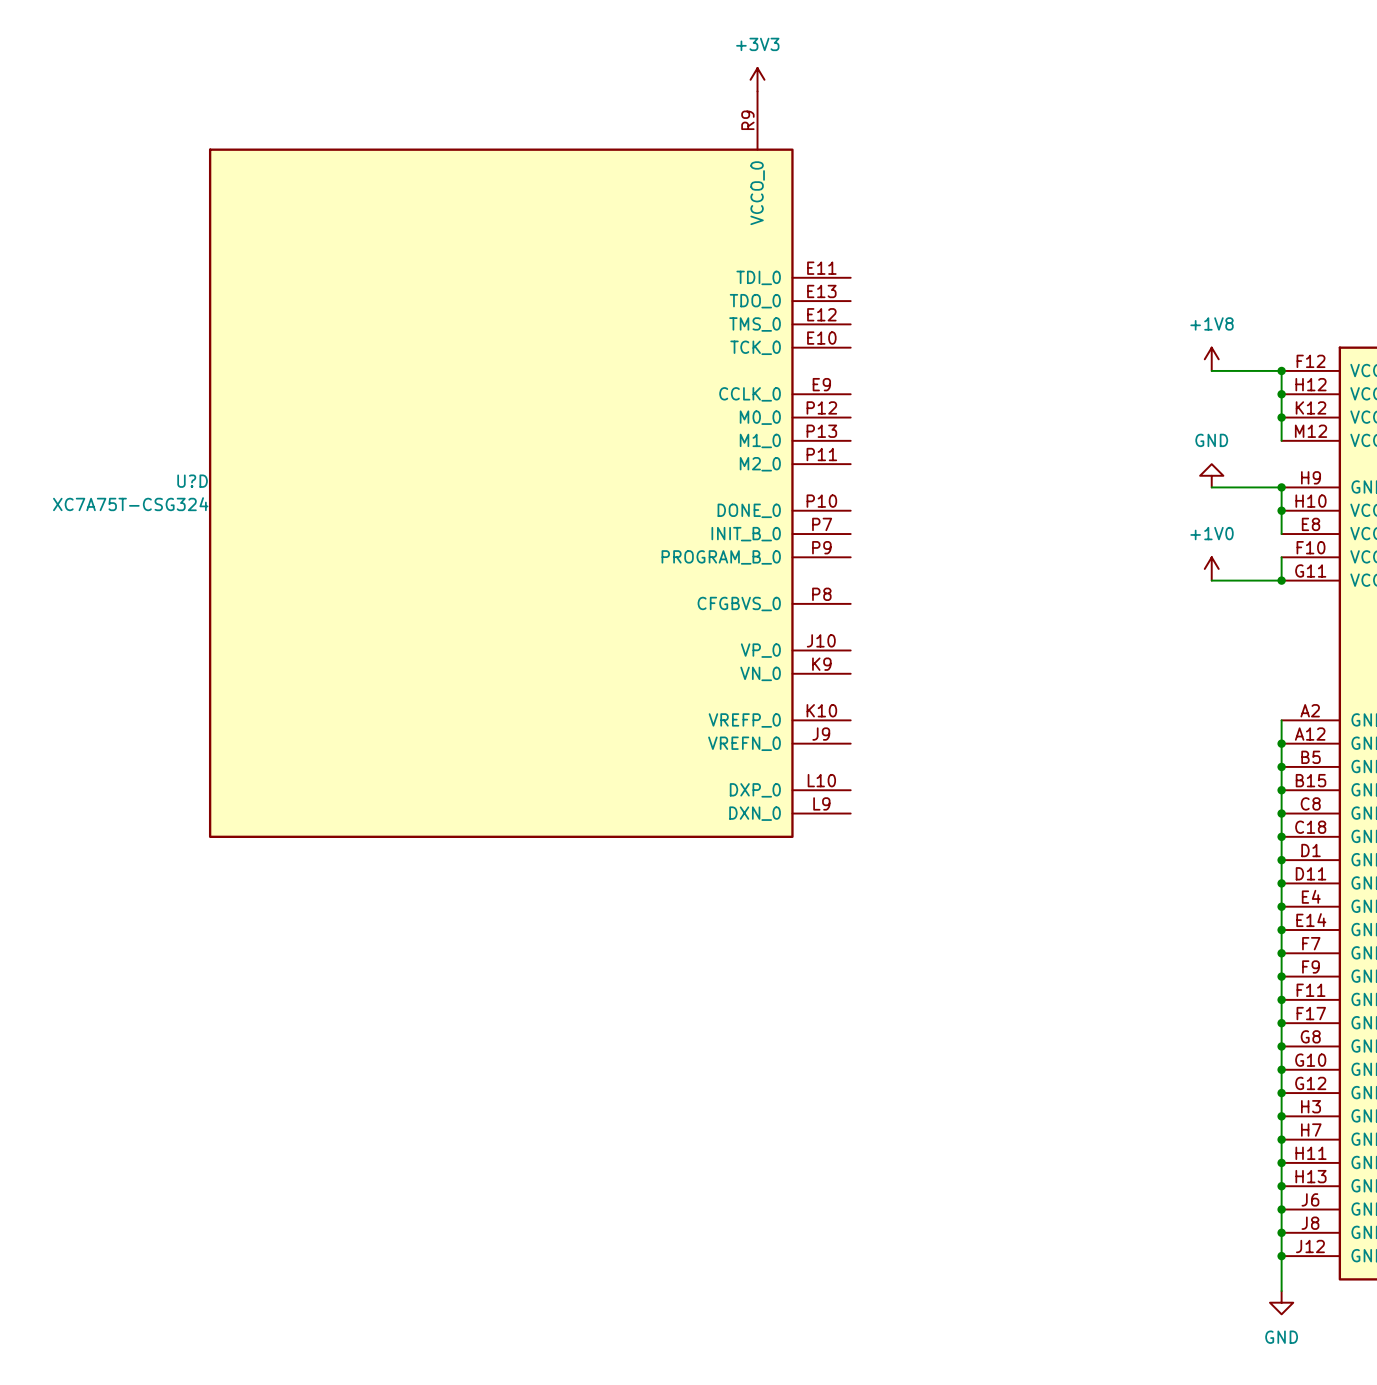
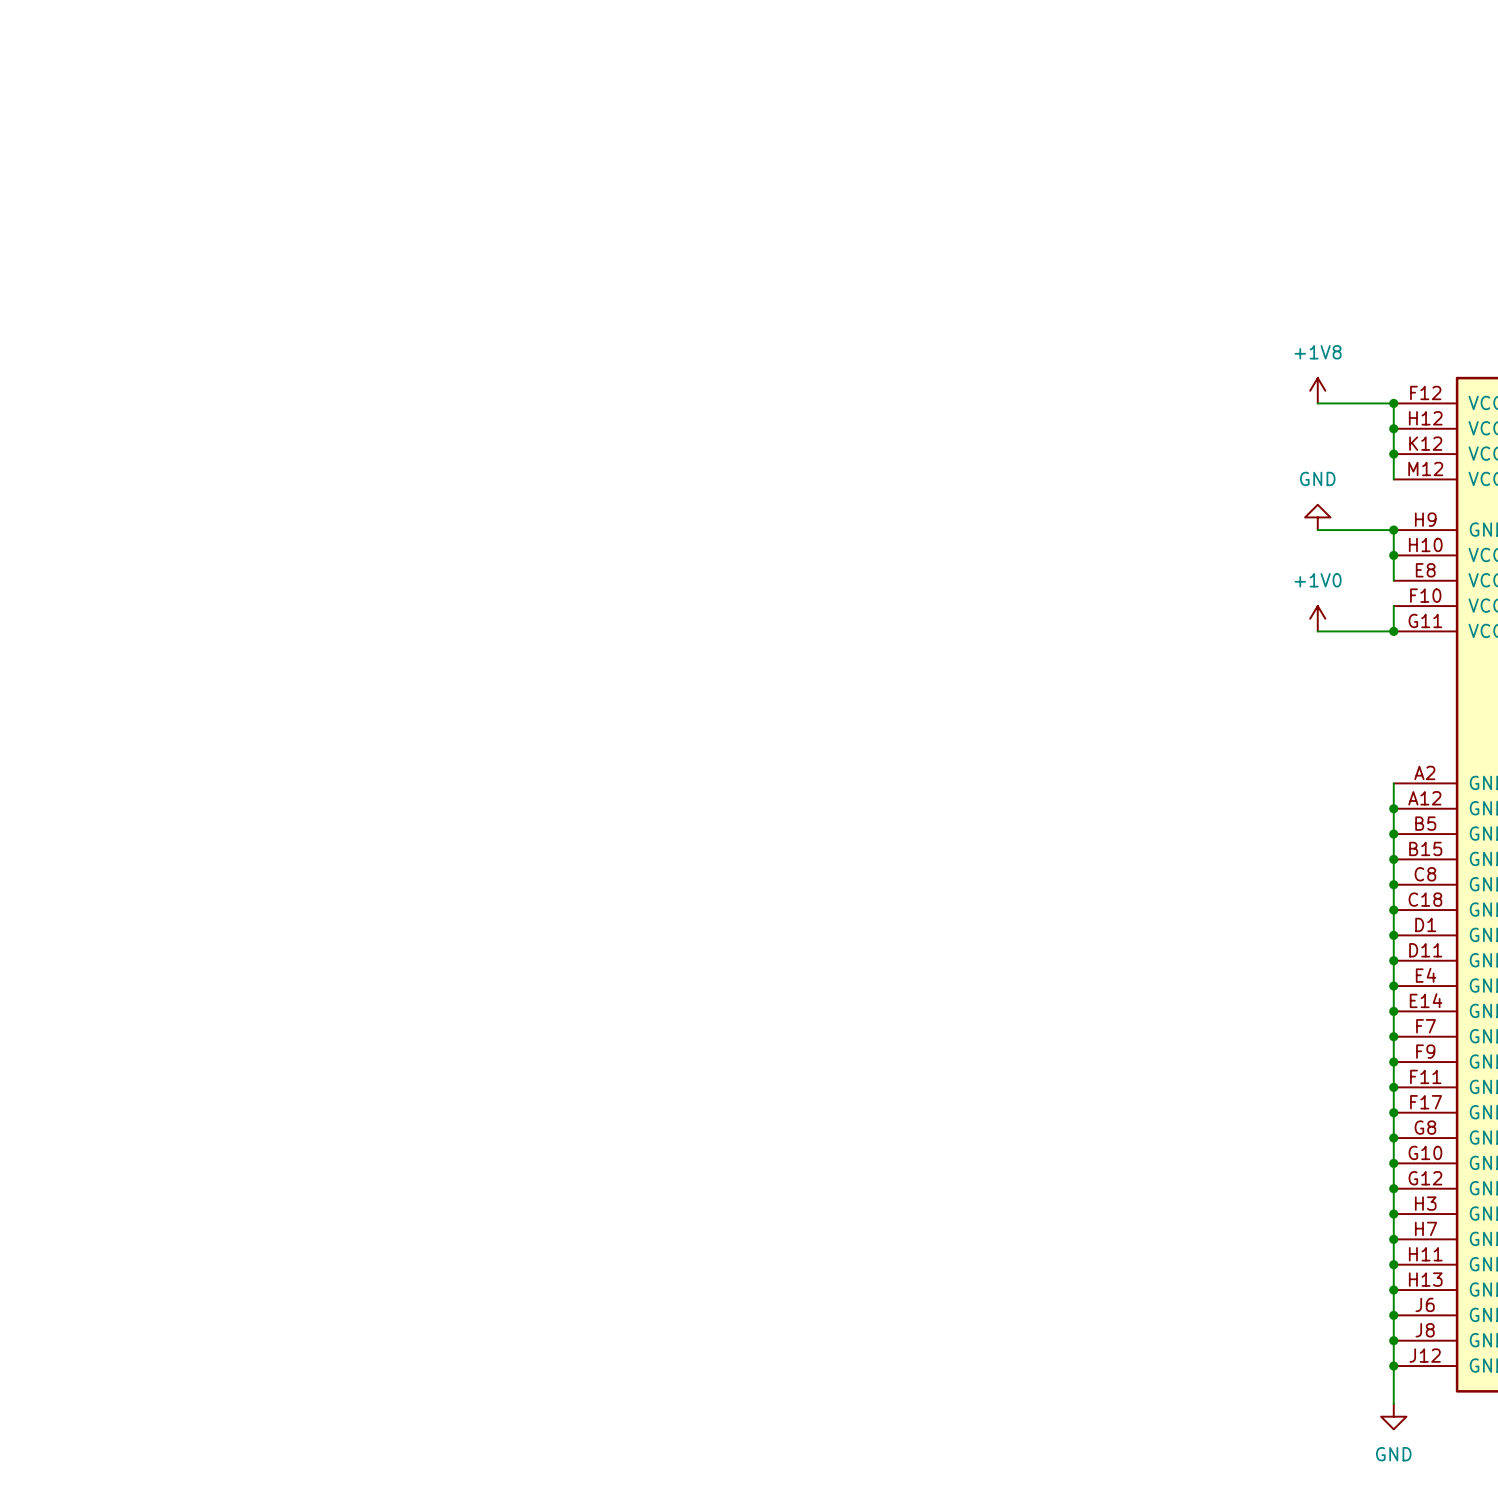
power symbol: +3V3 (757, 79) -> none
U?D: XC7A75T-CSG324 (529, 464) -> none

